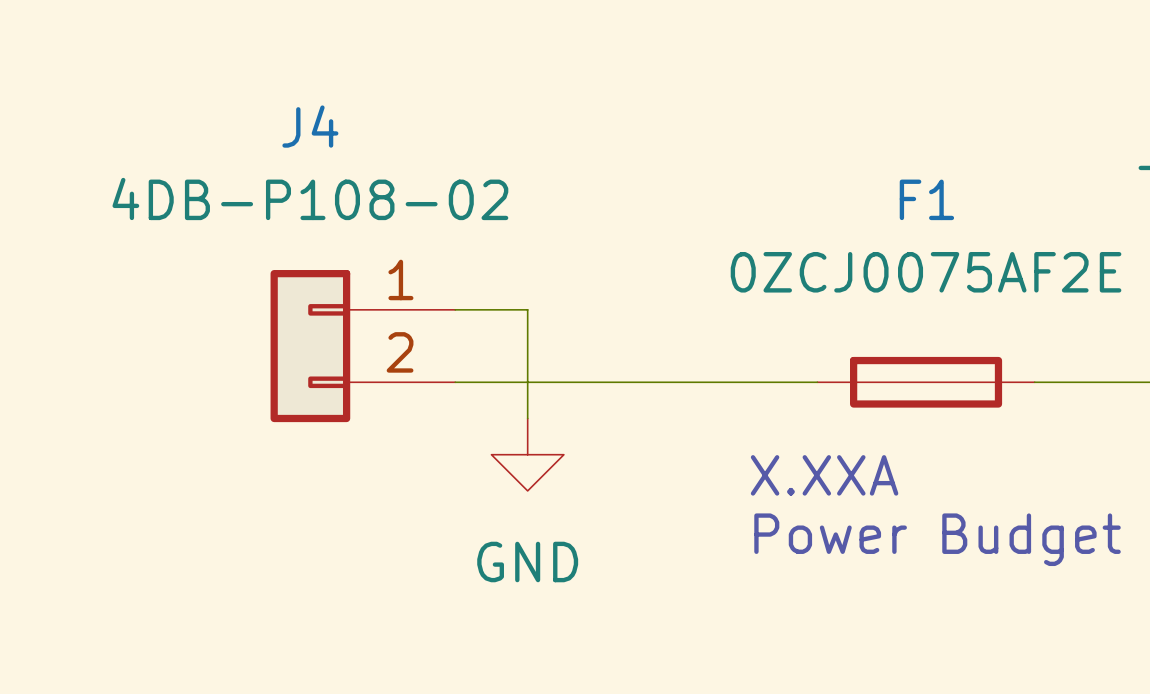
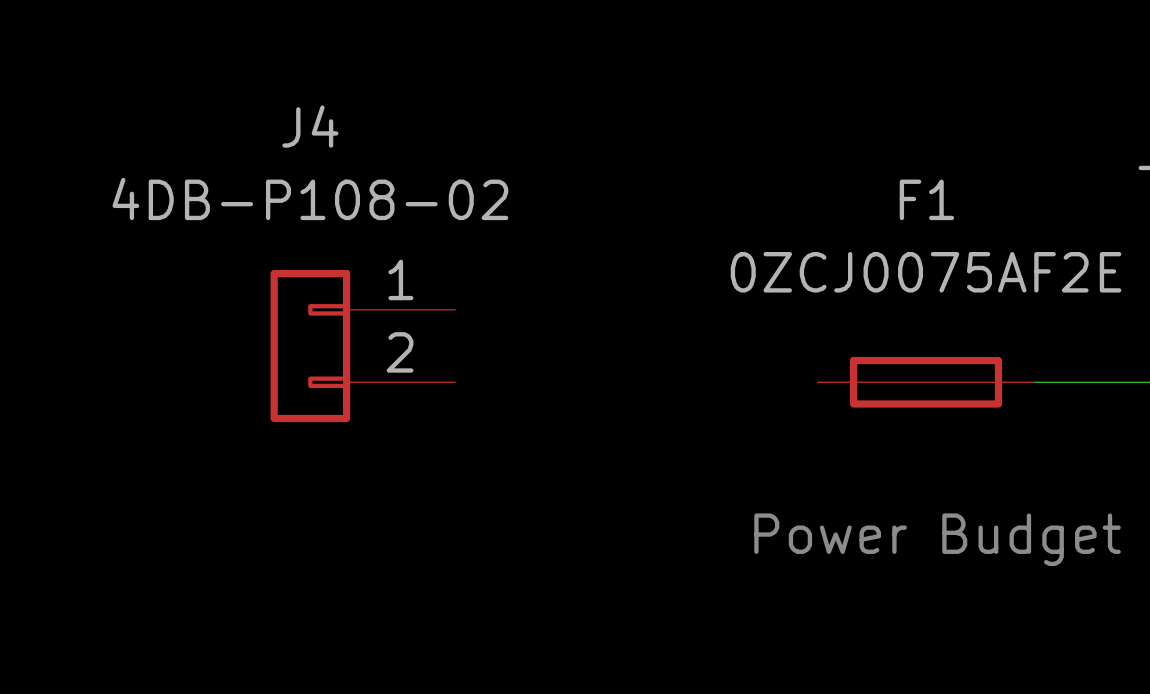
wire: (455, 309) (527, 309) (527, 418) -> none
wire: (455, 382) (817, 382) -> none
power symbol: GND (527, 454) -> none
text: X.XXA (824, 475) -> none

